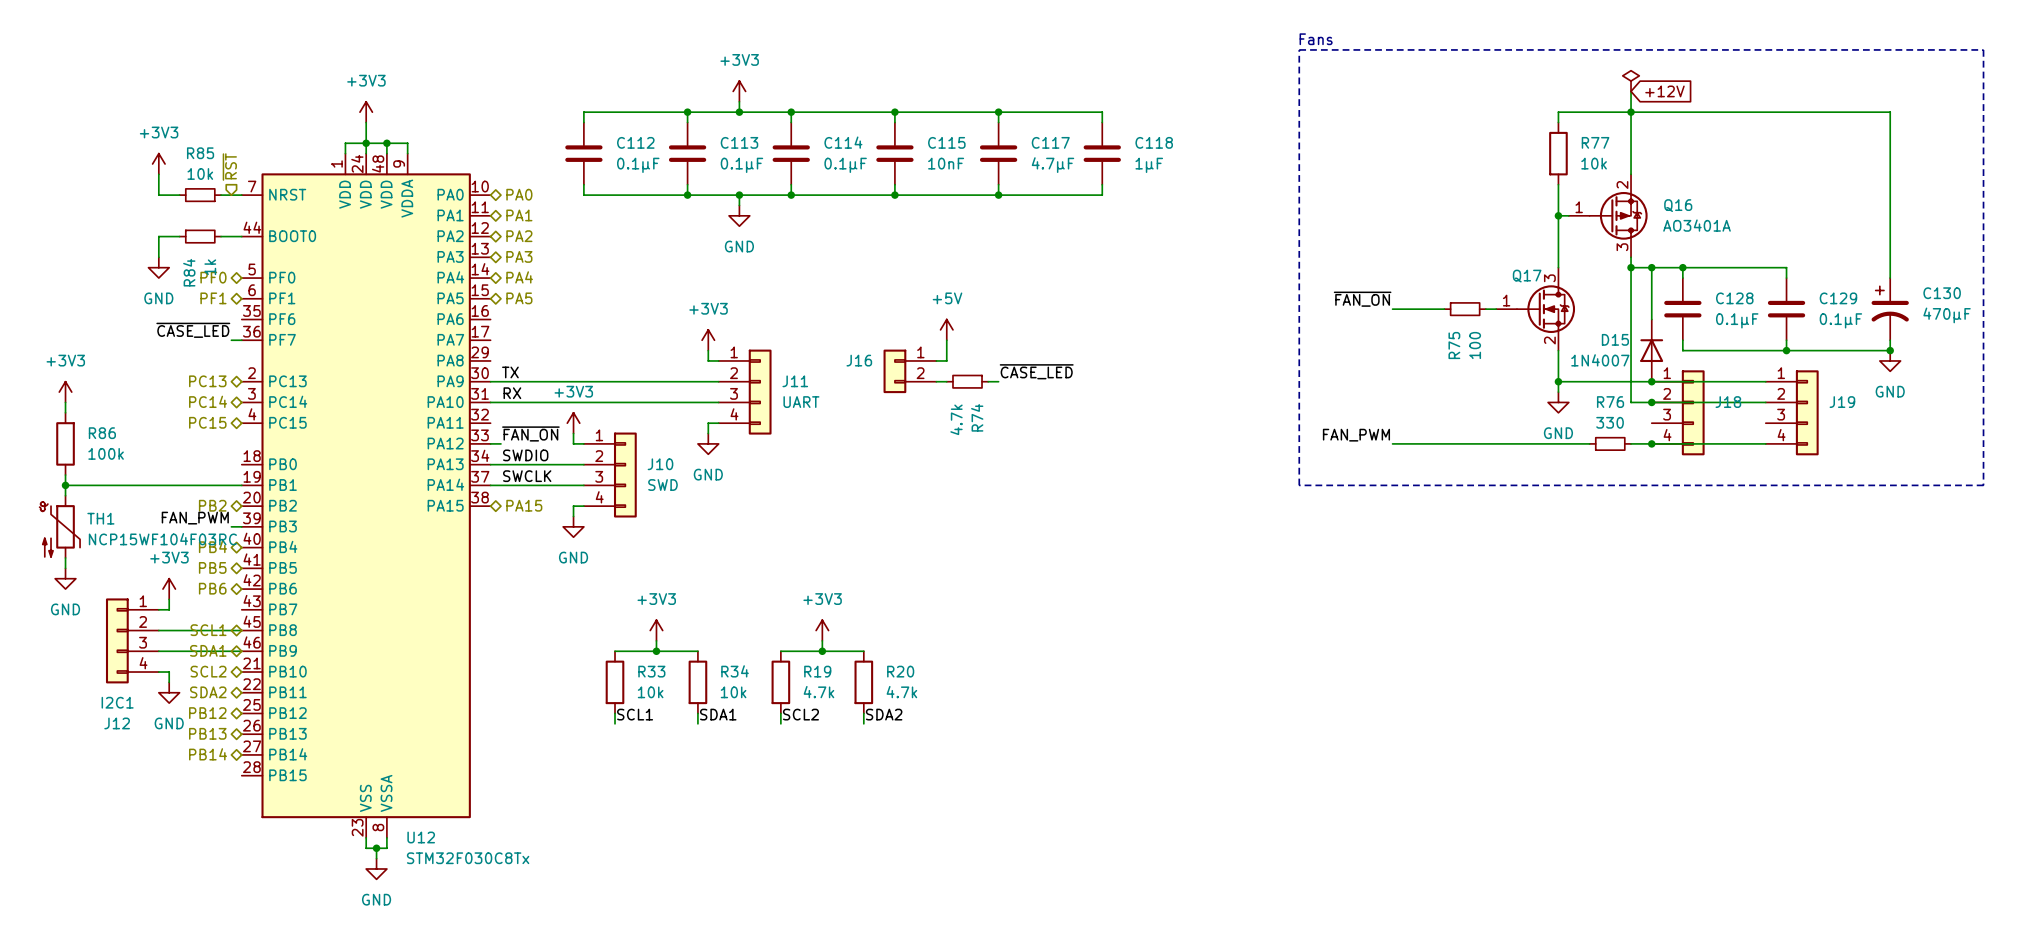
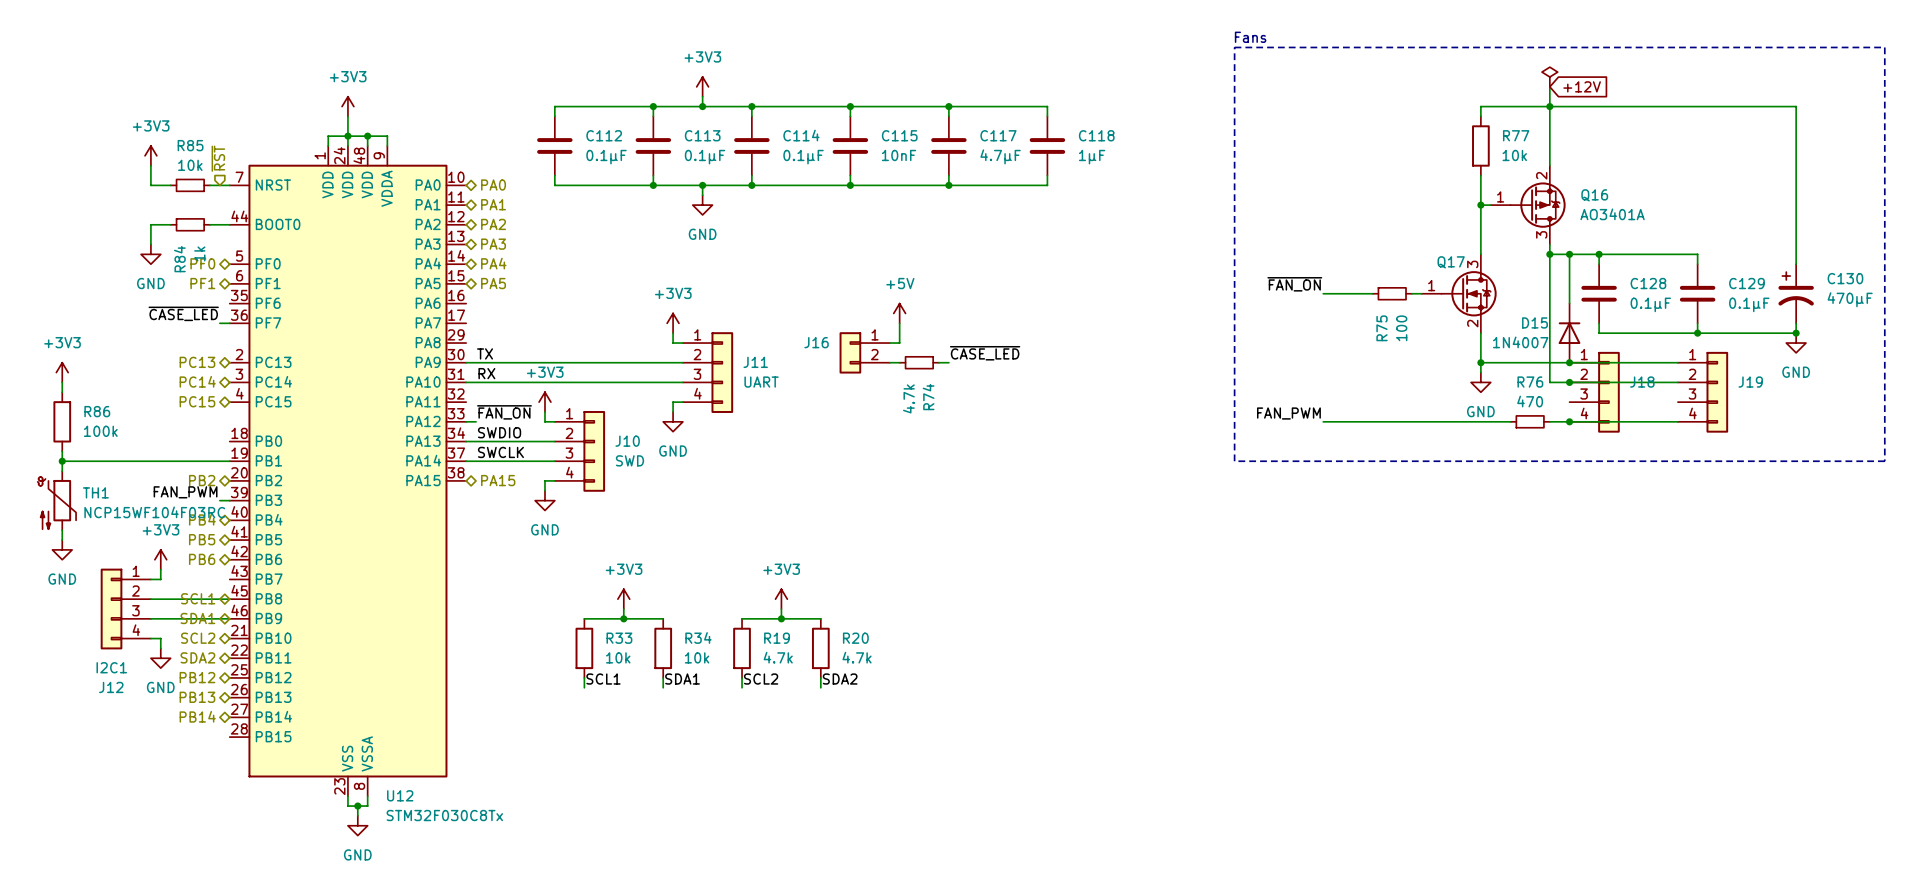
R76 value: 330 (1610, 422) -> 470 (1530, 401)

